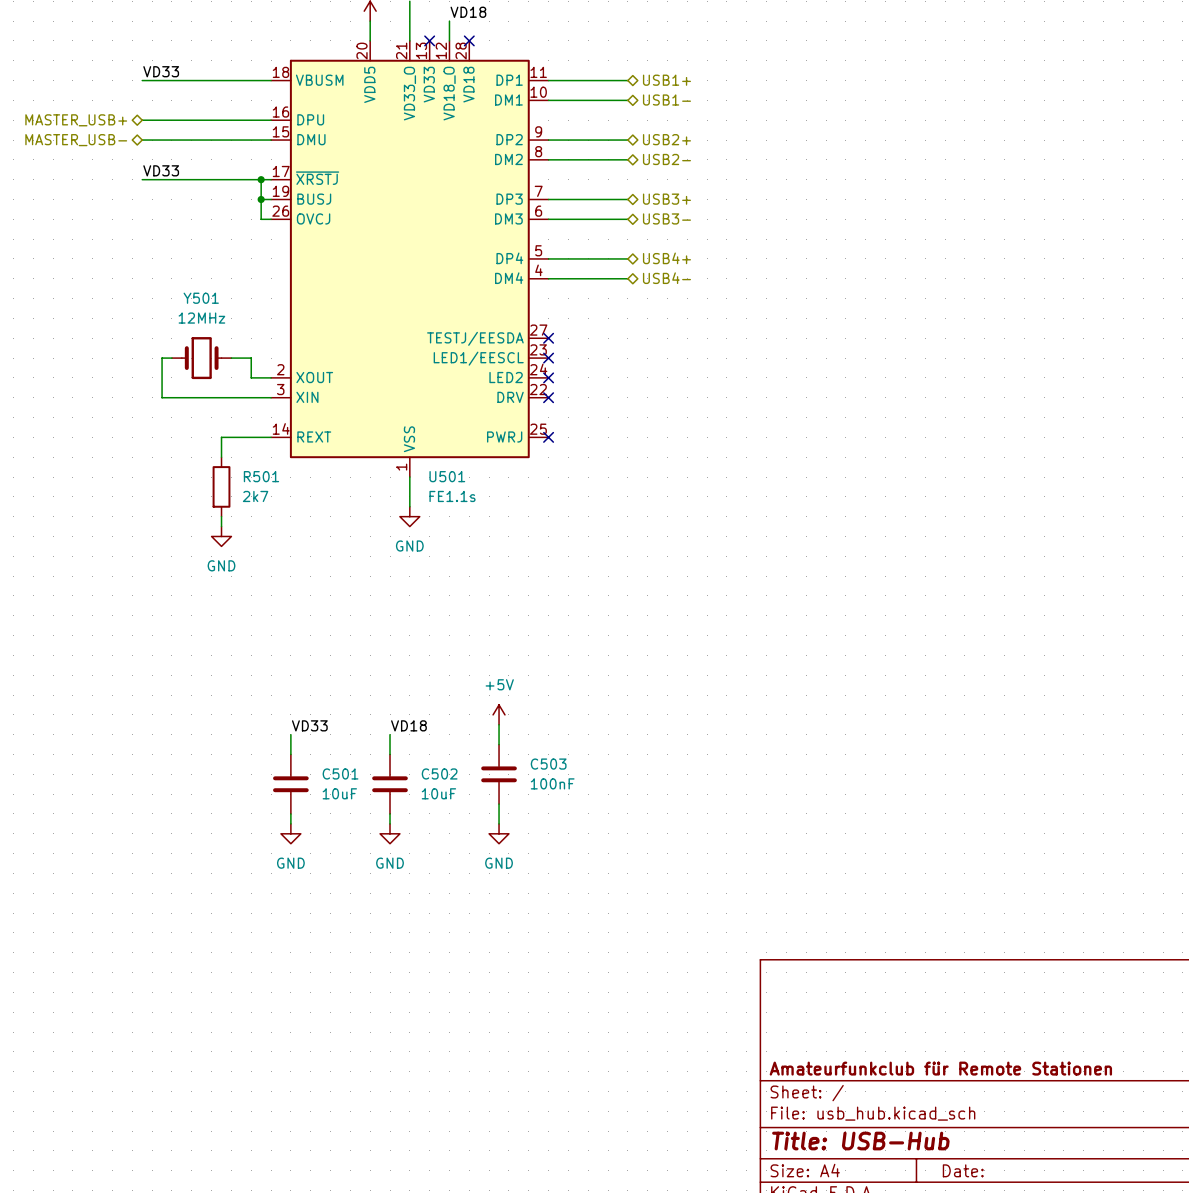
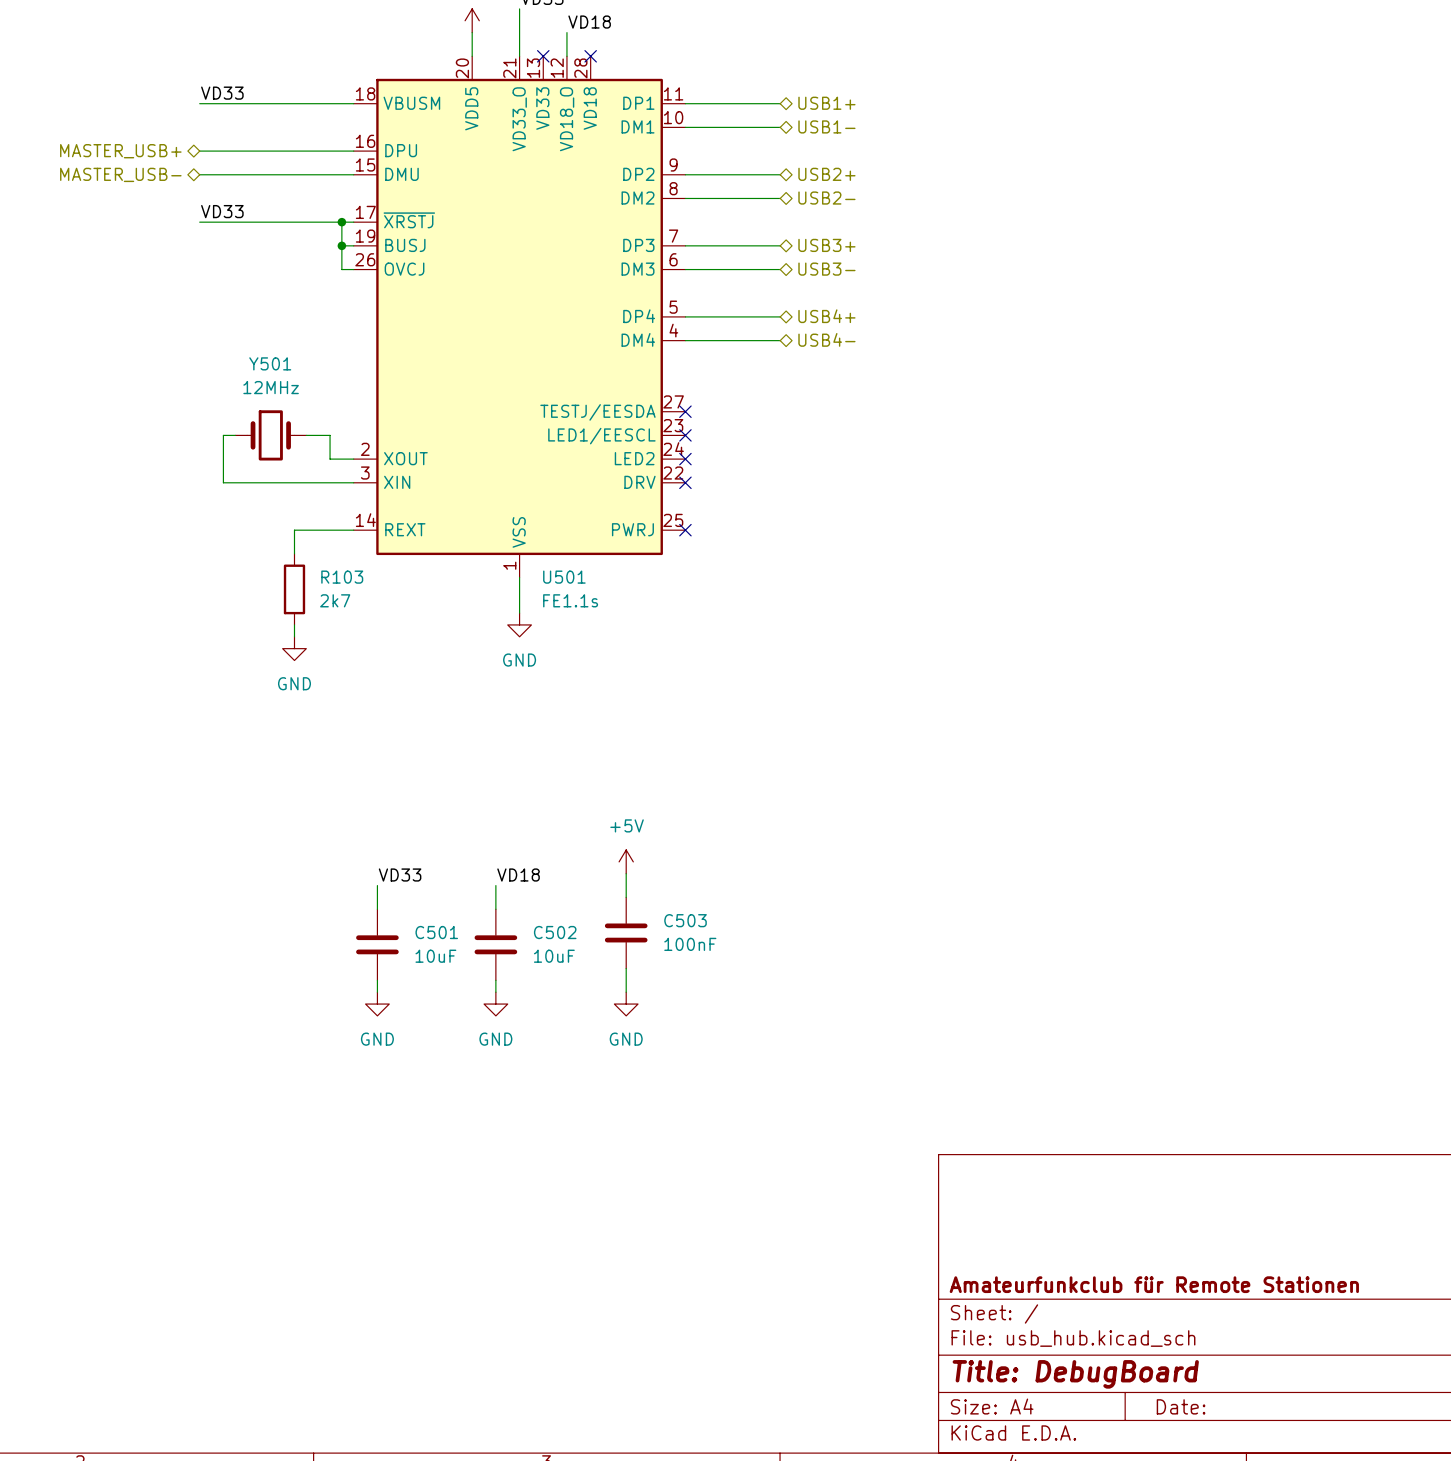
R501 name: R501 (261, 476) -> R103 (342, 577)
title block: Title: USB-Hub (860, 1141) -> Title: DebugBoard (1075, 1374)

